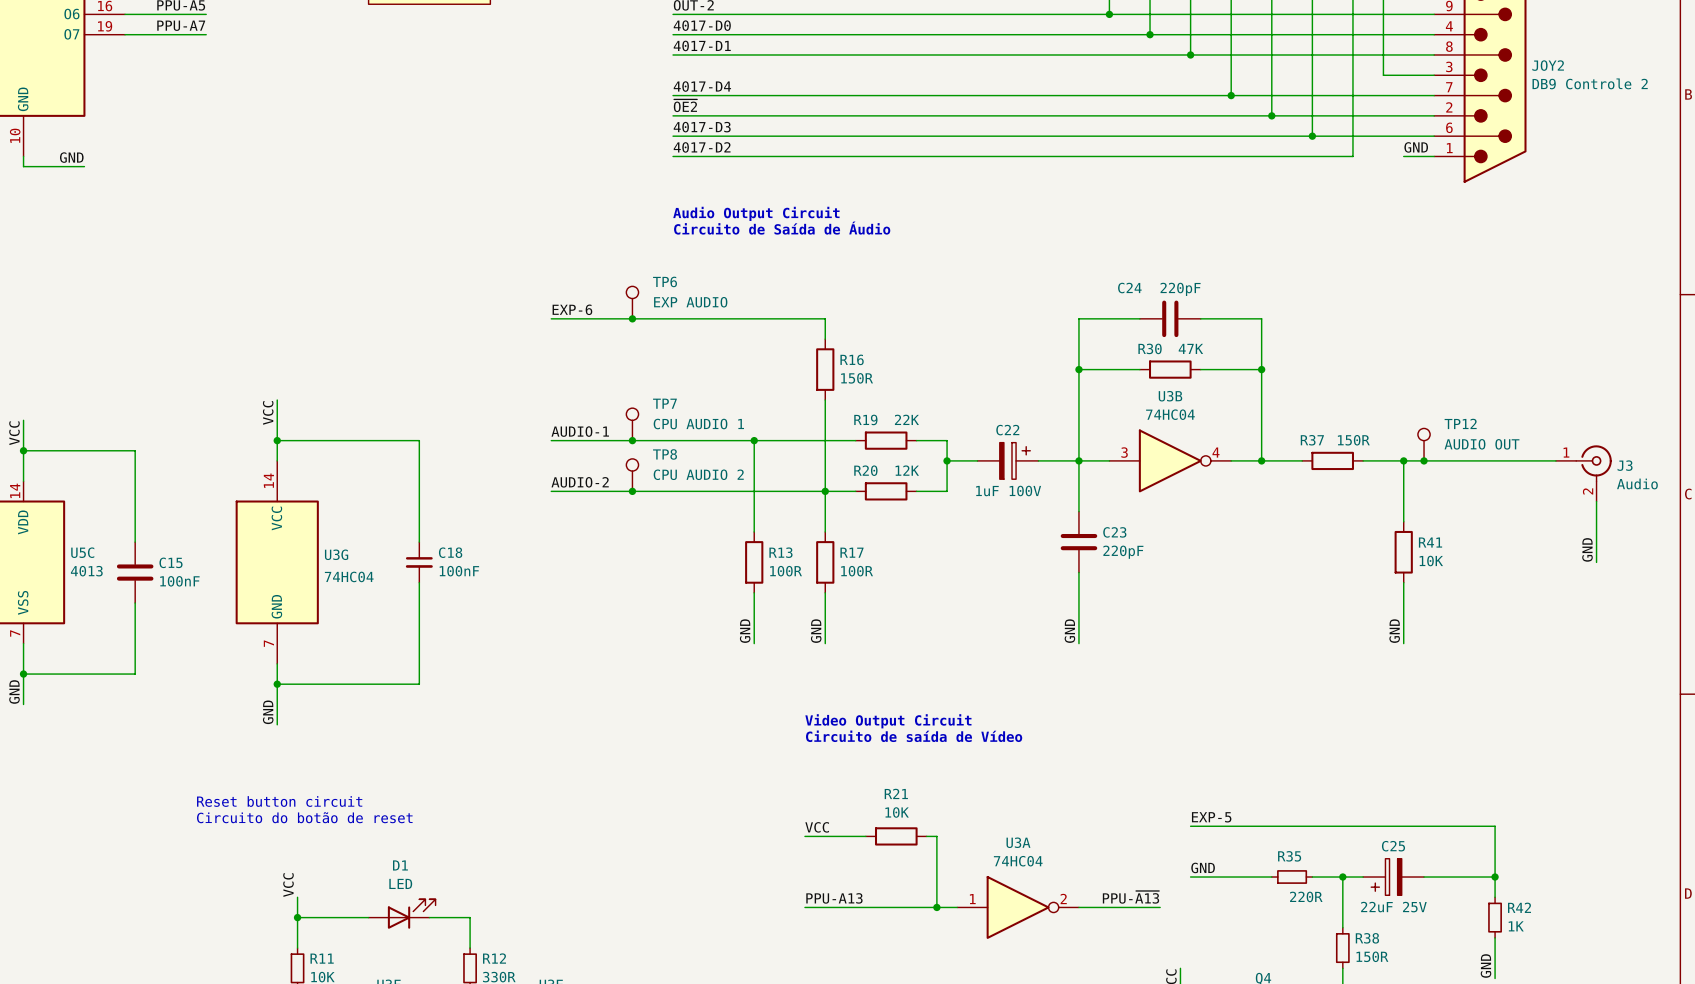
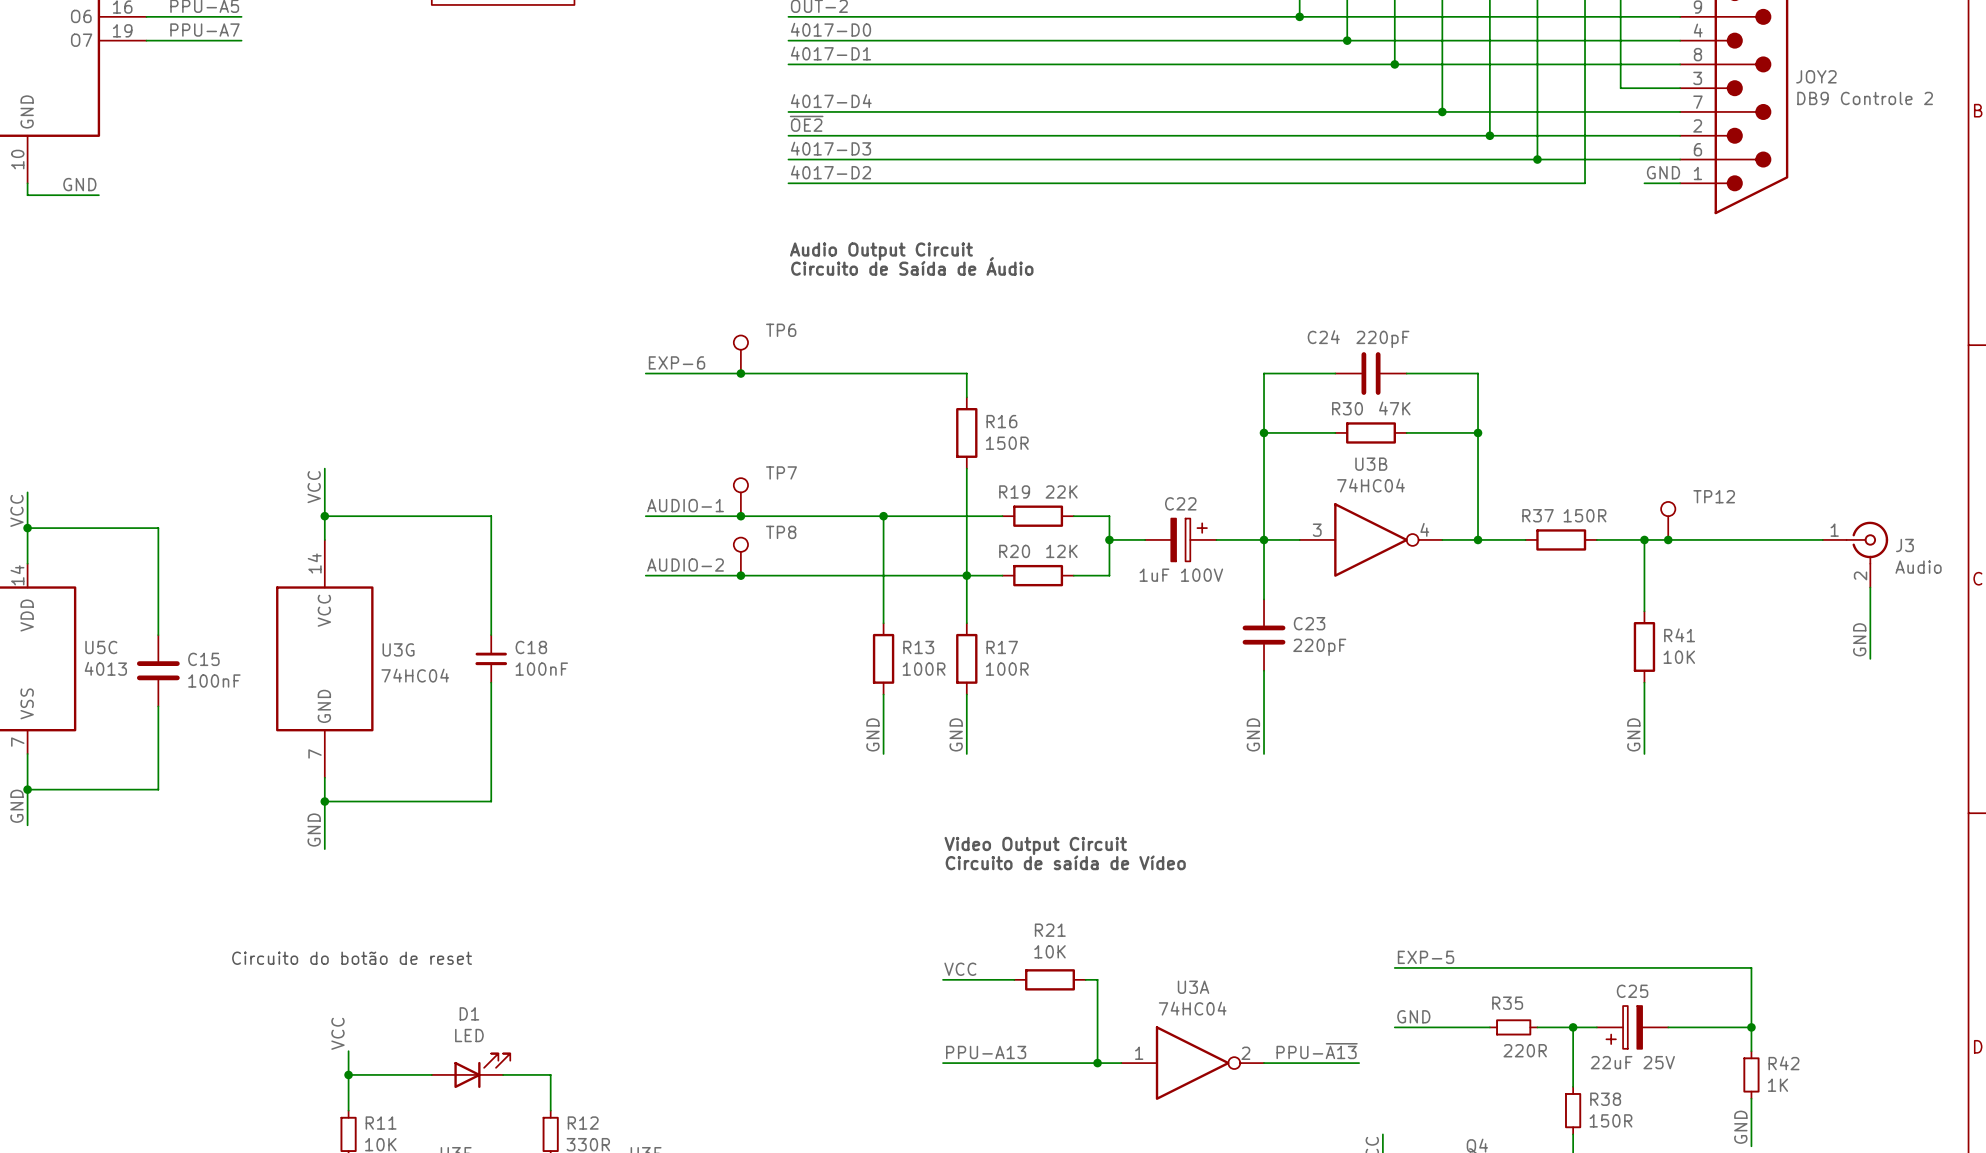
TP6 value: EXP AUDIO (690, 302) -> none
TP7 value: CPU AUDIO 1 (698, 424) -> none
TP12 value: AUDIO OUT (1481, 444) -> none
TP8 value: CPU AUDIO 2 (698, 474) -> none
text: Reset button circuit (279, 801) -> none

